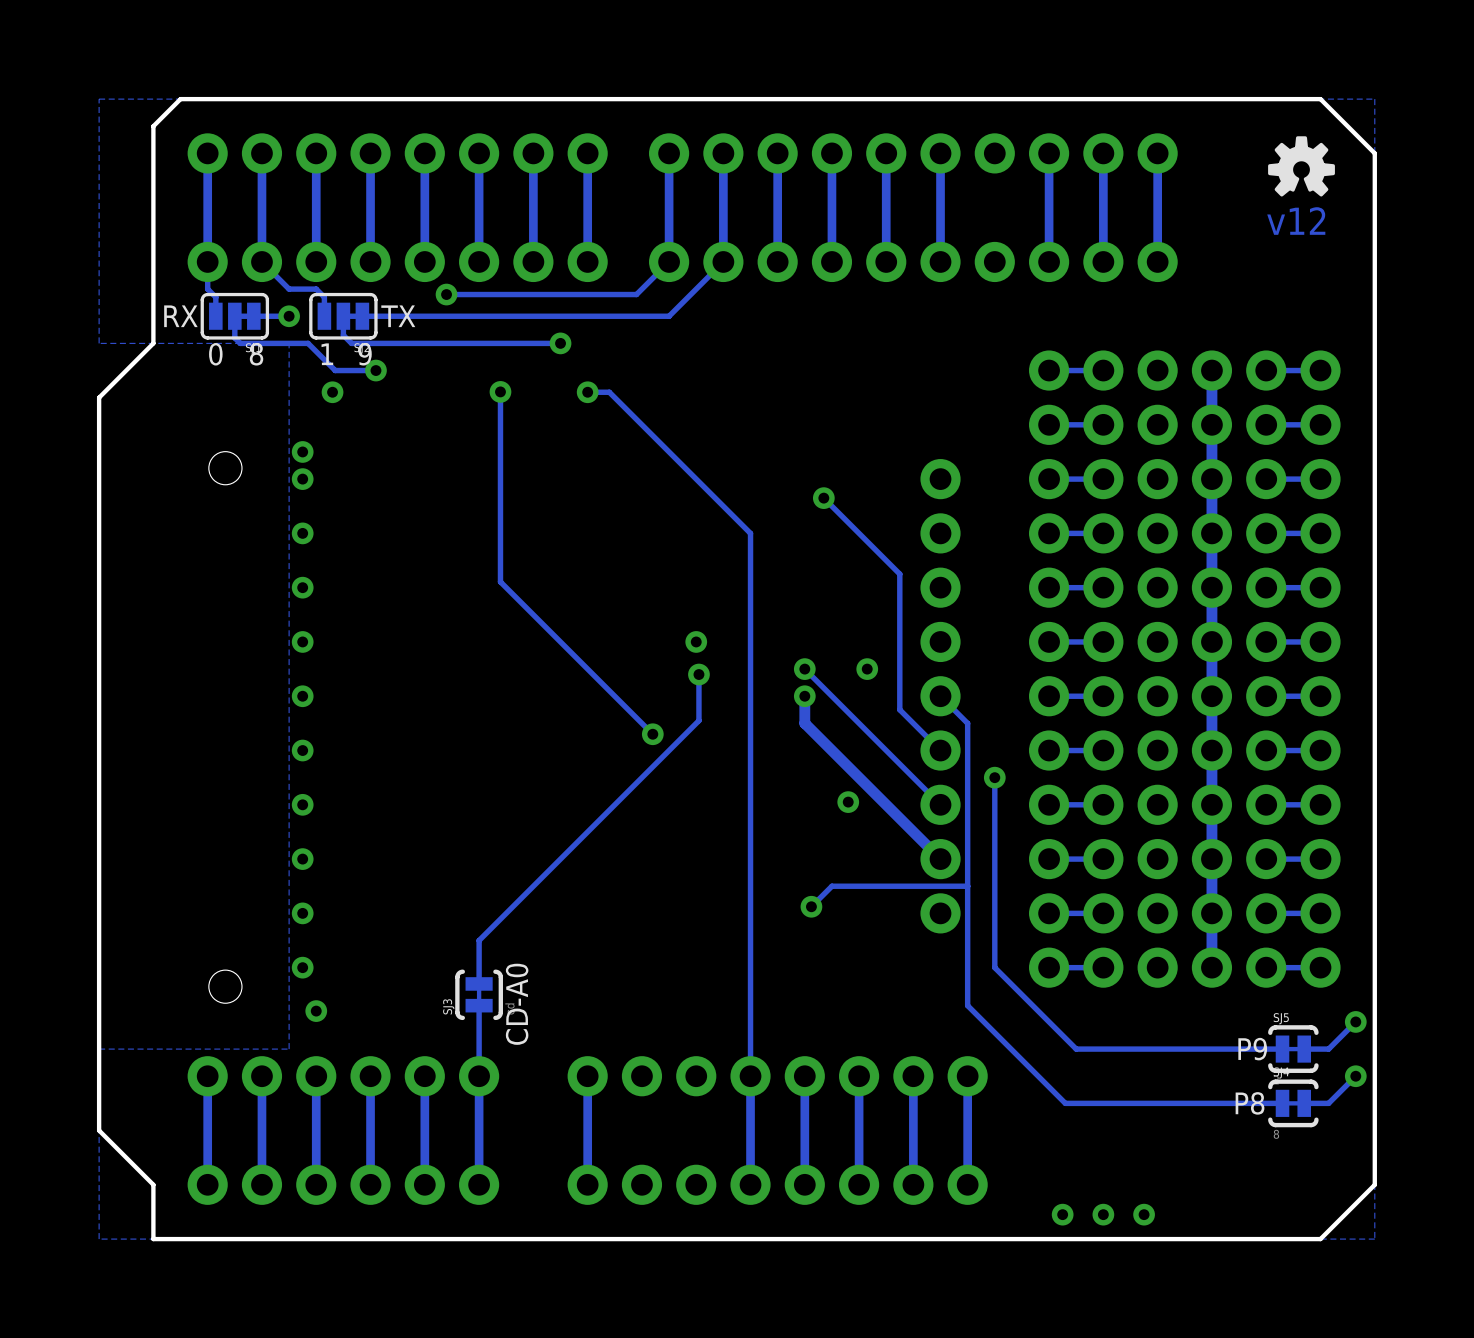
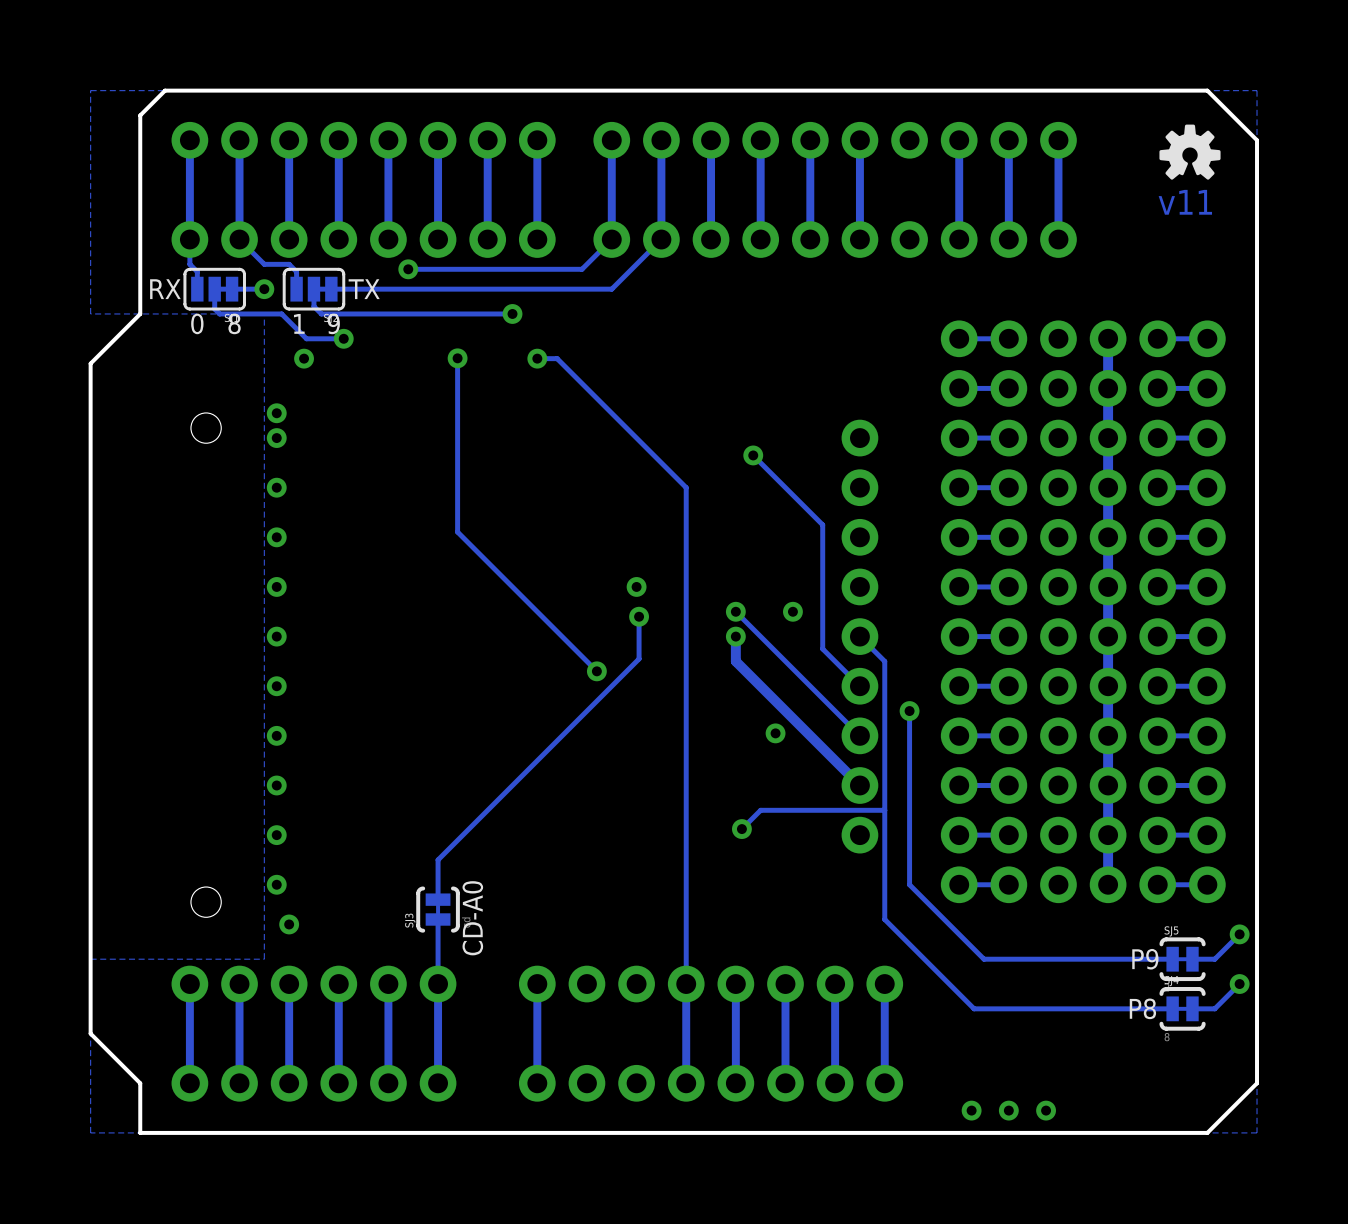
text: v12 (1296, 221) -> v11 (1185, 202)

